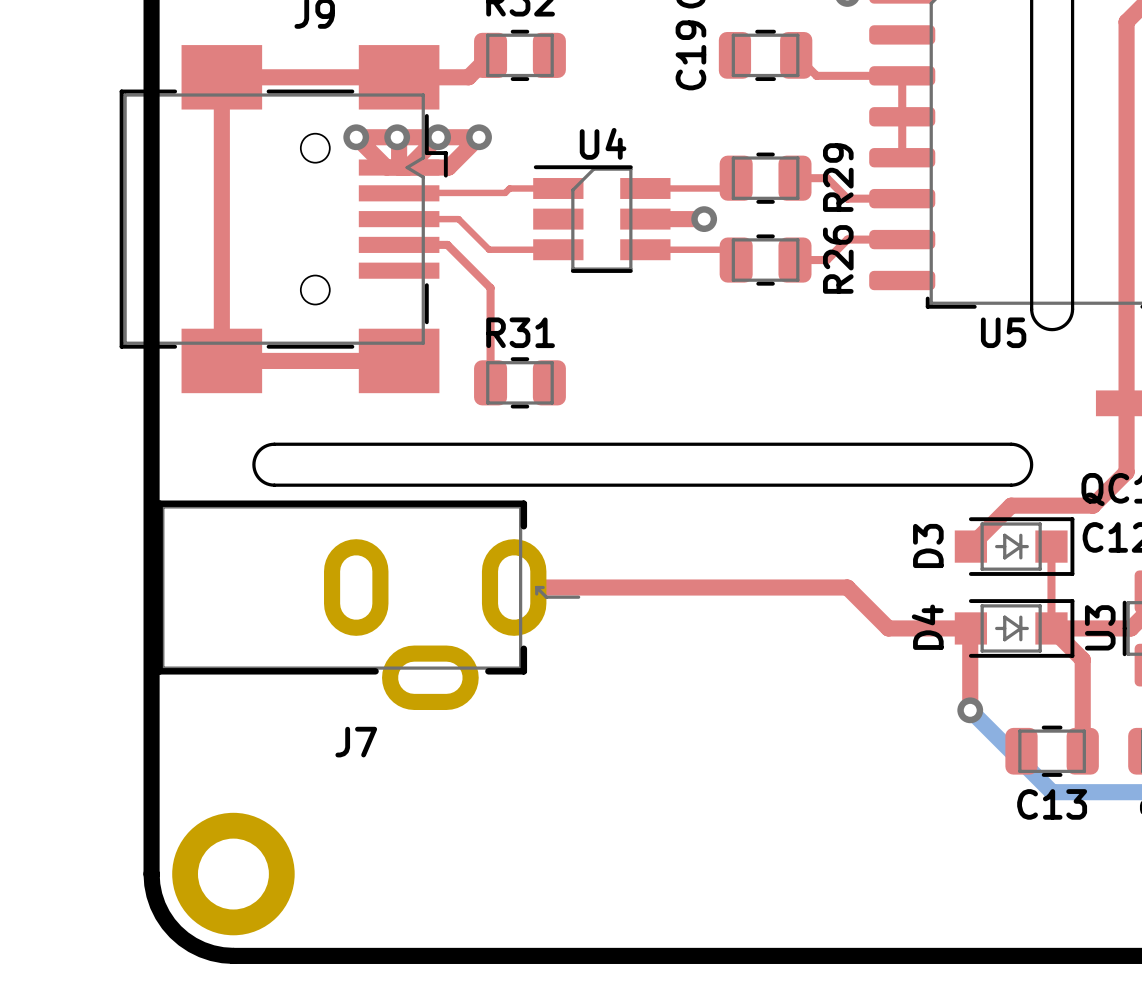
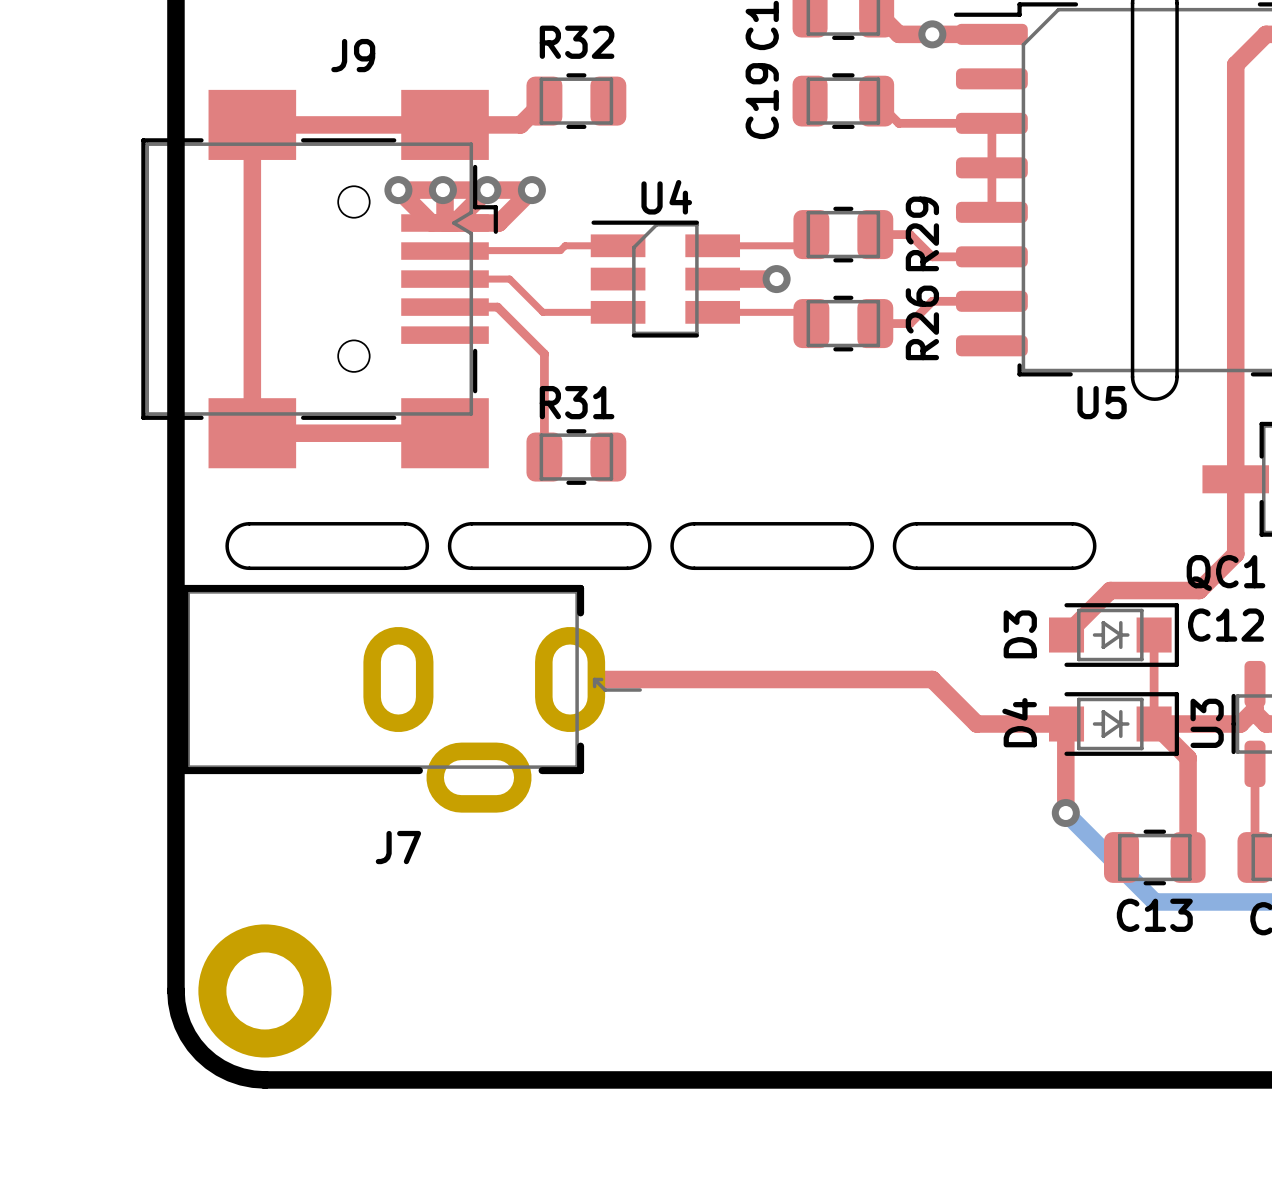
board edge: (274, 444) (260, 449) (256, 455) (253, 464) (259, 478) (267, 483) (274, 485) -> (309, 523) (244, 524) (232, 531) (227, 546) (232, 560) (244, 567) (309, 568)
board edge: (362, 444) (423, 444) -> (405, 523) (419, 529) (424, 535) (427, 546) (424, 556) (419, 562) (405, 568)
board edge: (567, 444) (628, 444) -> (627, 523) (635, 525) (644, 531) (649, 546) (647, 556) (642, 562) (627, 568)
board edge: (771, 444) (833, 444) -> (850, 523) (860, 526) (866, 531) (872, 546) (866, 560) (860, 565) (850, 568)
board edge: (976, 444) (1018, 445) (1028, 453) (1031, 464) (1028, 476) (1018, 483) (976, 485) -> (1072, 523) (1087, 529) (1092, 535) (1094, 546) (1092, 556) (1087, 562) (1072, 568)
board edge: (362, 485) (423, 485) -> (471, 523) (461, 526) (455, 531) (449, 546) (451, 553) (457, 562) (471, 568)
board edge: (567, 485) (628, 485) -> (694, 523) (683, 526) (677, 531) (672, 546) (673, 553) (679, 562) (694, 568)
board edge: (771, 485) (833, 485) -> (916, 523) (902, 529) (895, 538) (894, 546) (900, 560) (908, 566) (916, 568)

